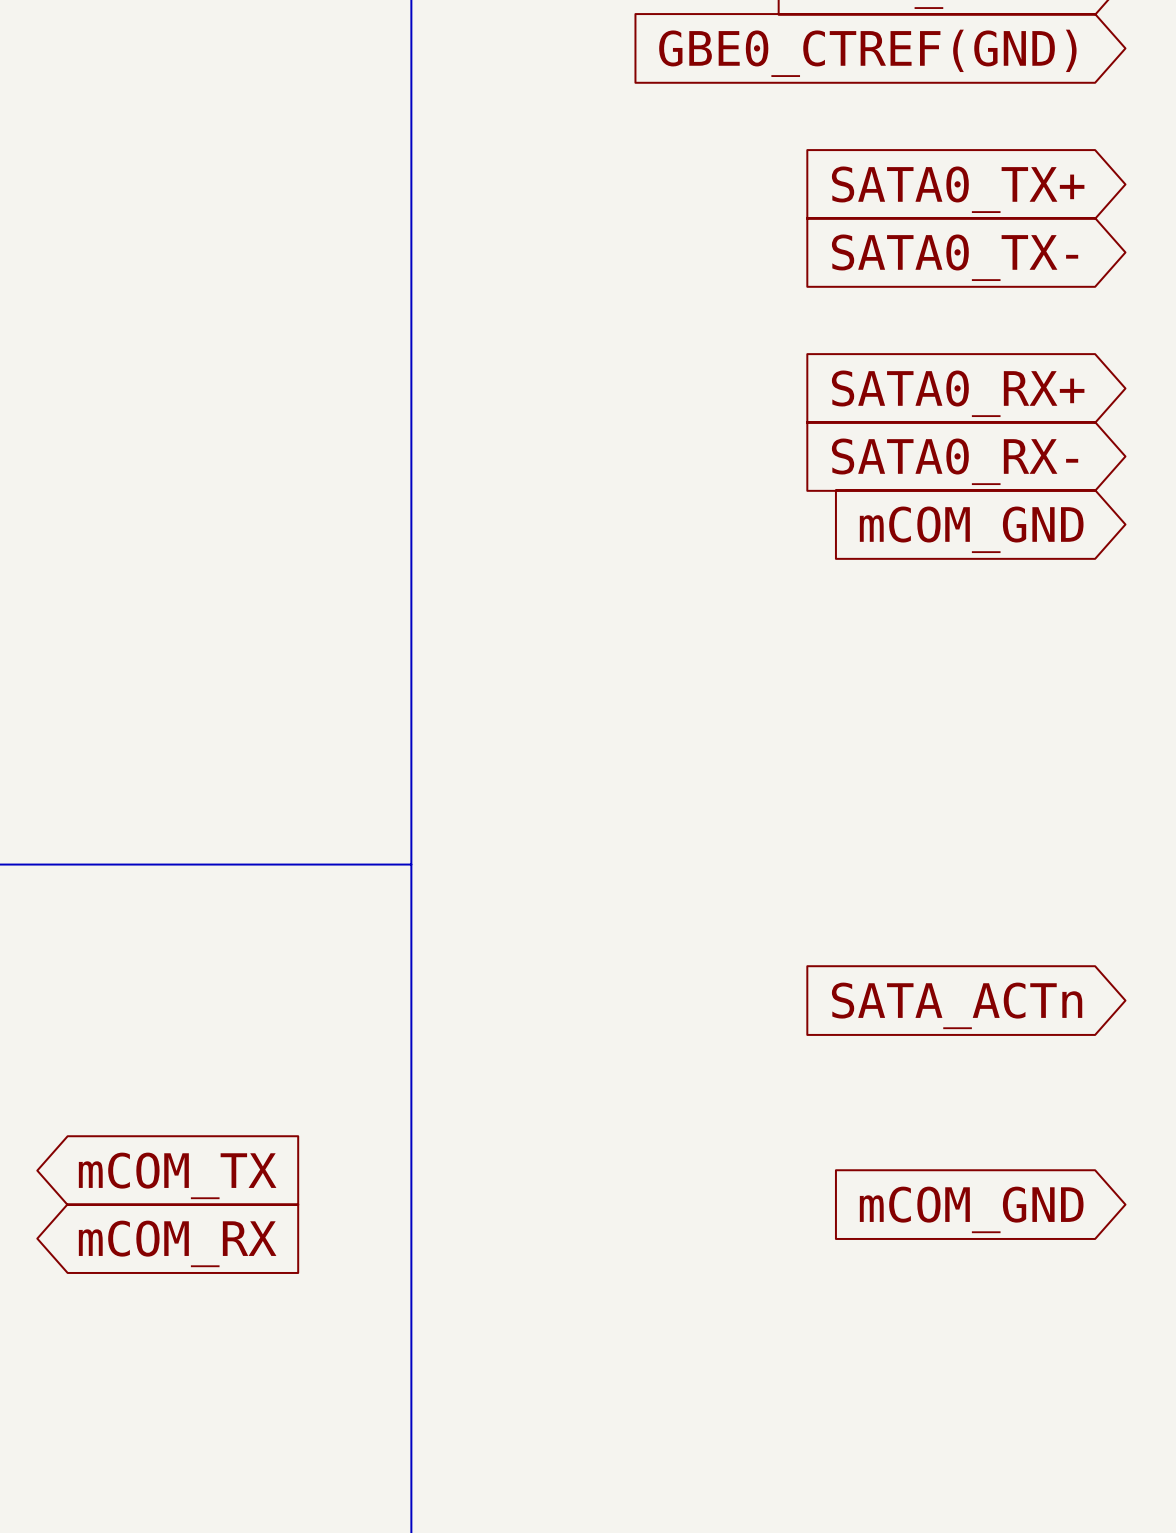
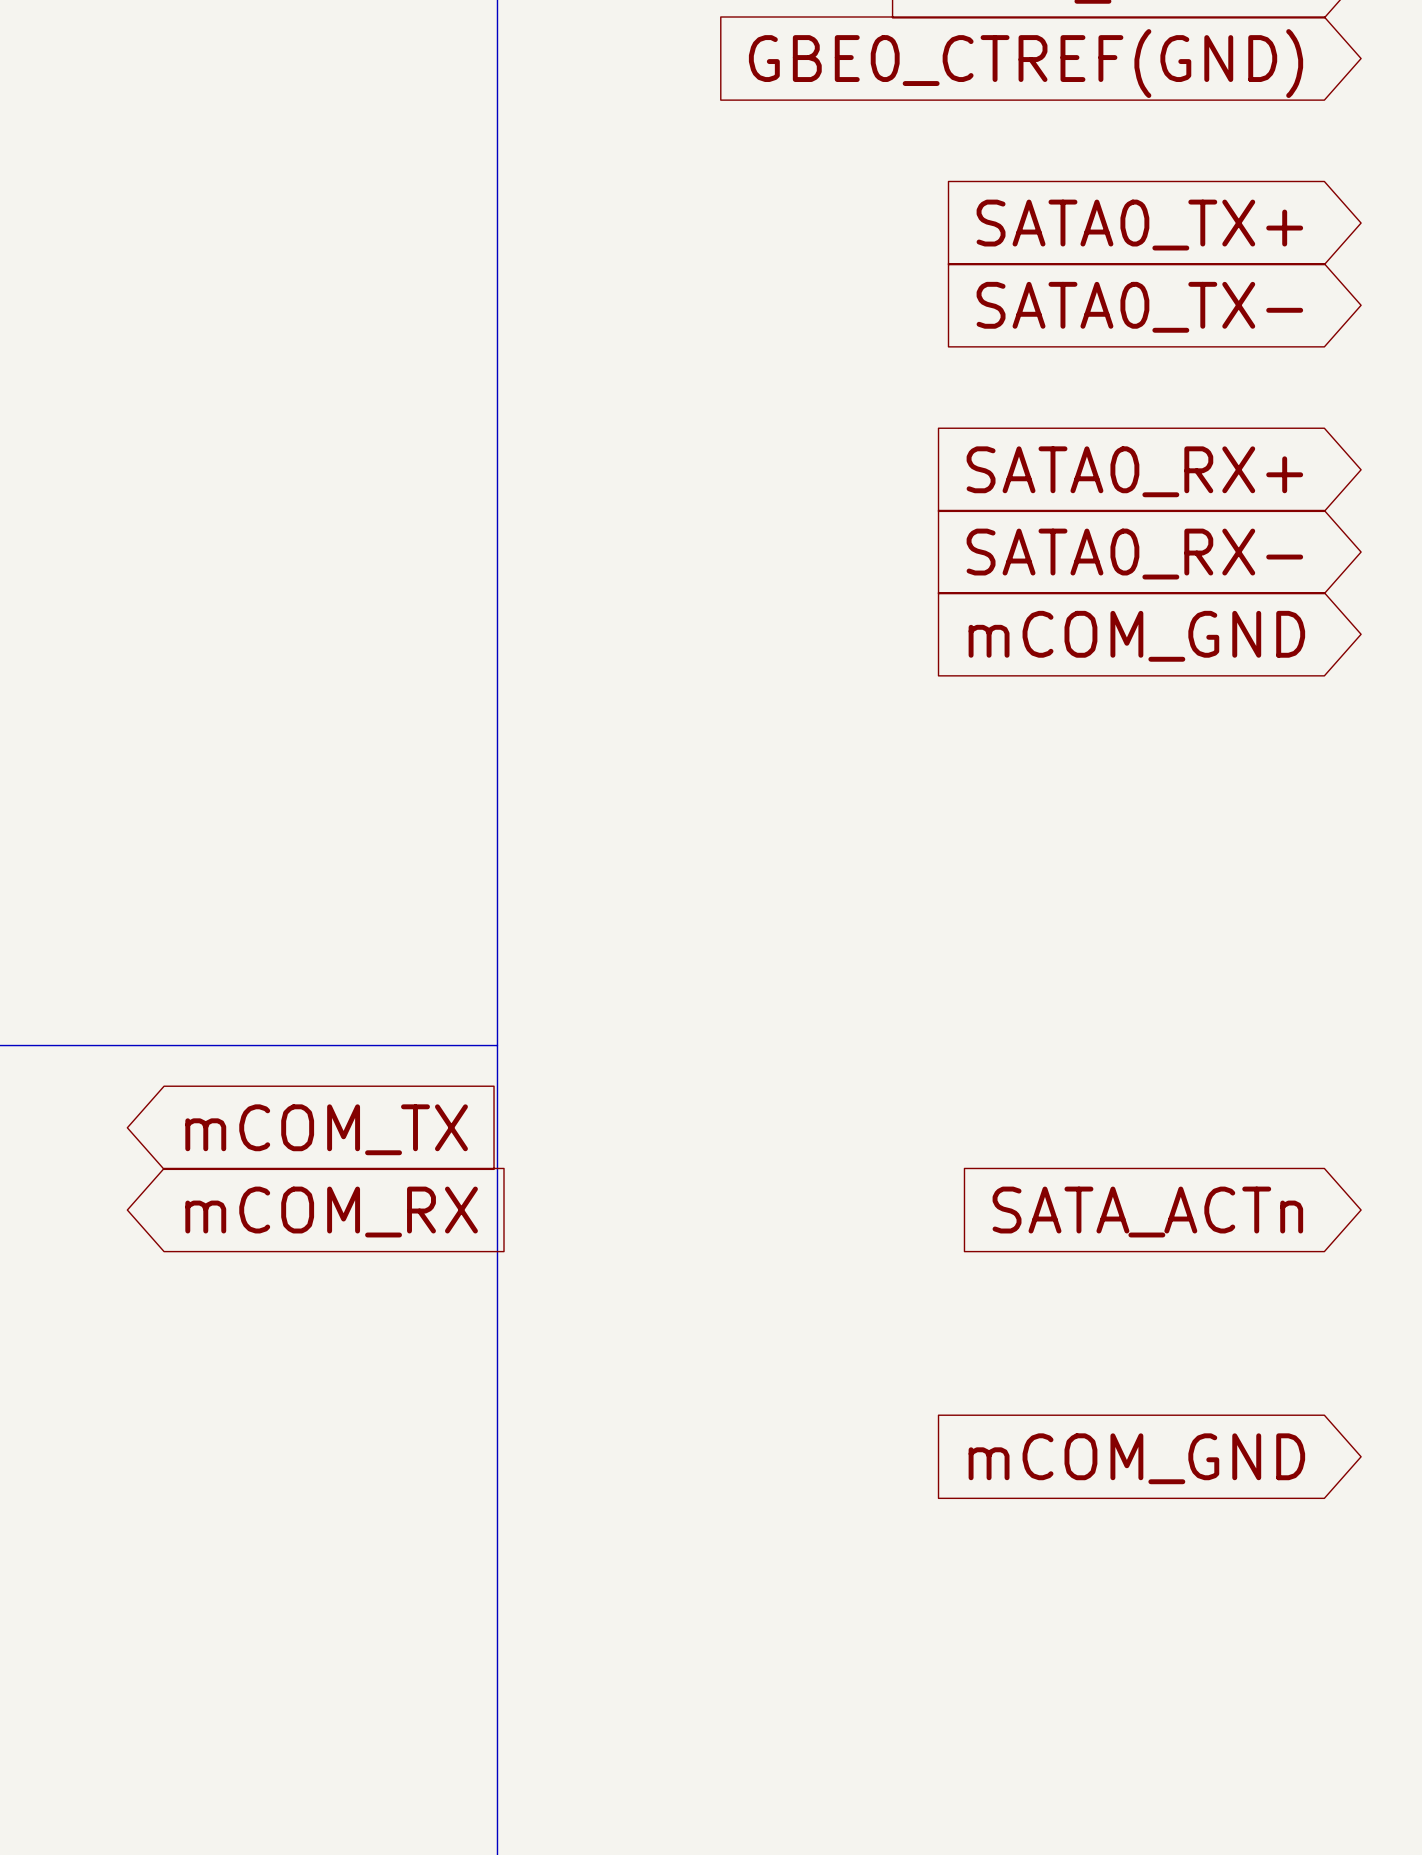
global label position: mCOM_TX (177, 1175) -> mCOM_TX (326, 1129)
global label position: mCOM_RX (177, 1243) -> mCOM_RX (331, 1212)

